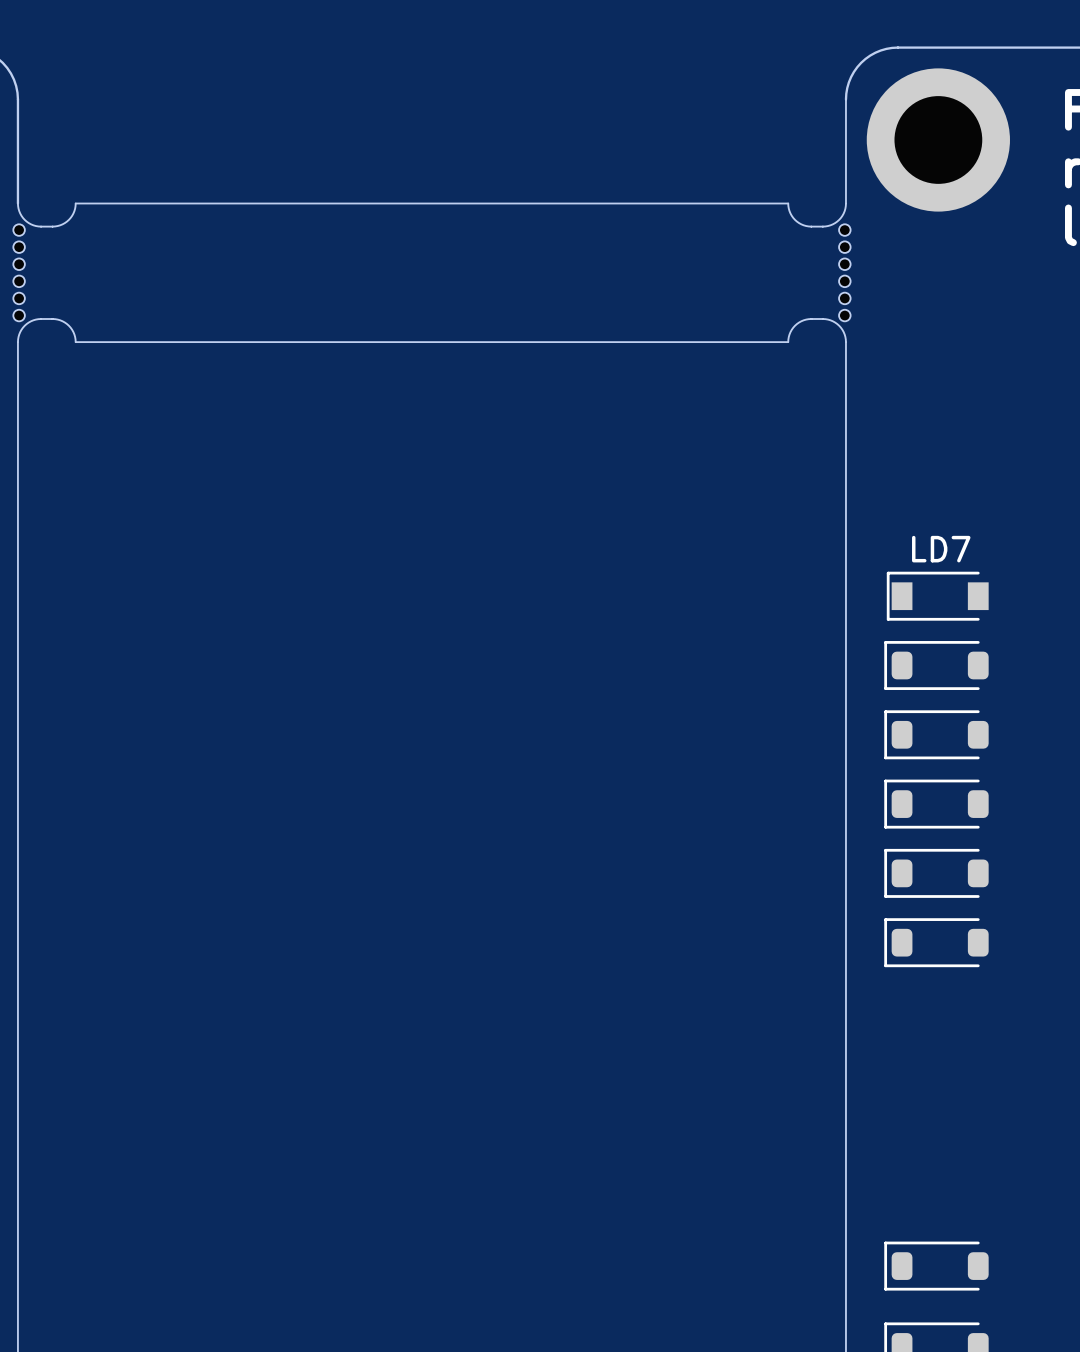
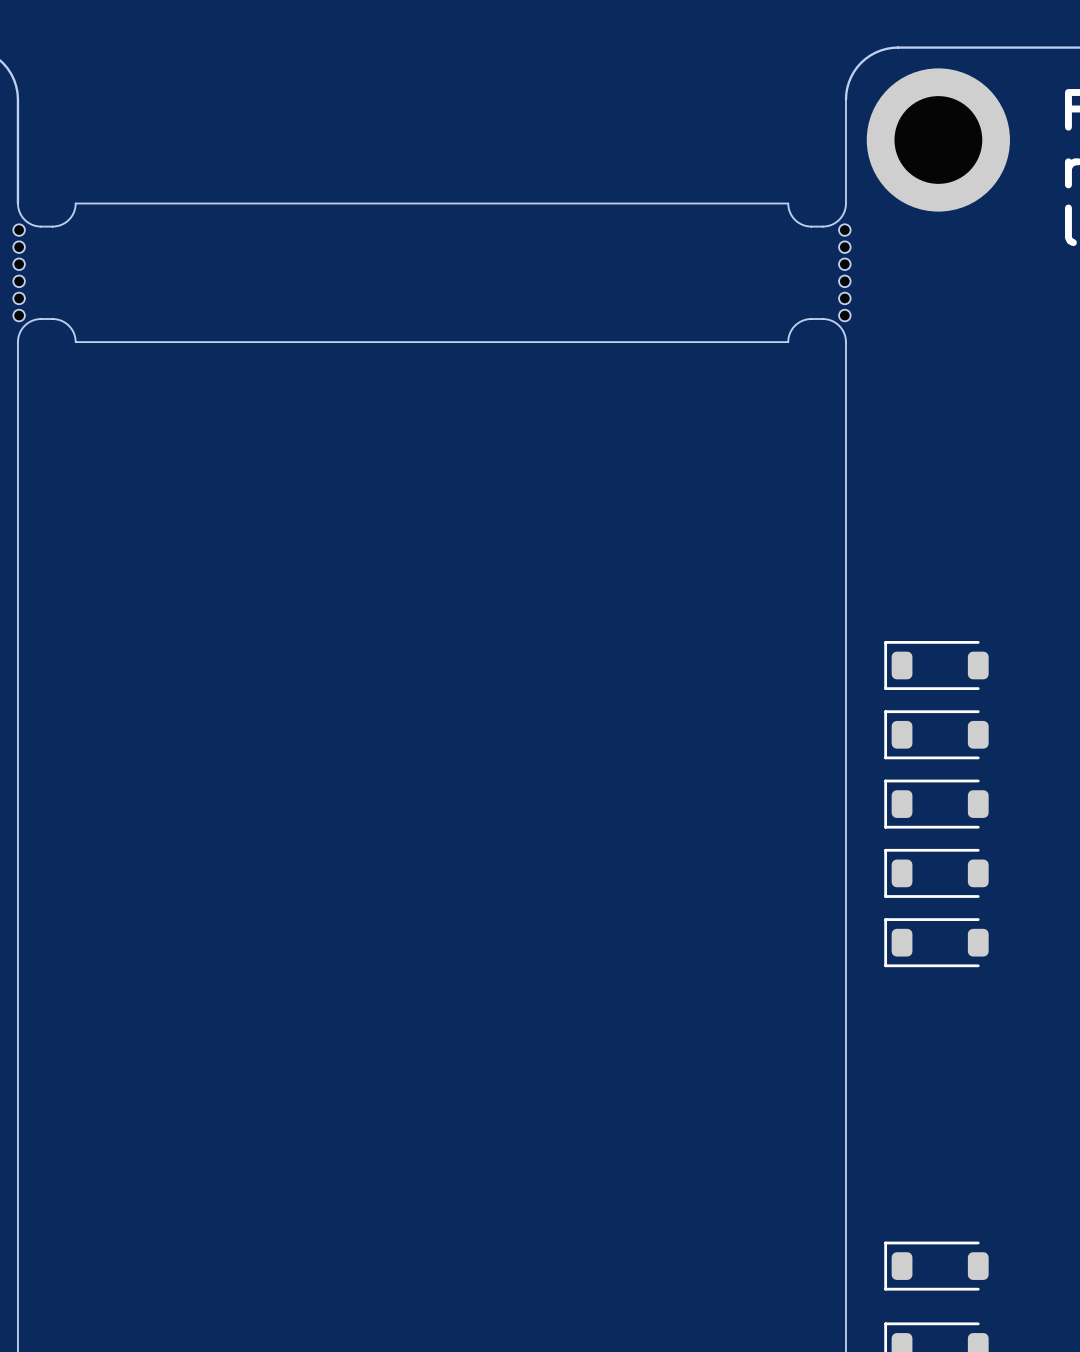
LD7: (937, 596) -> none

